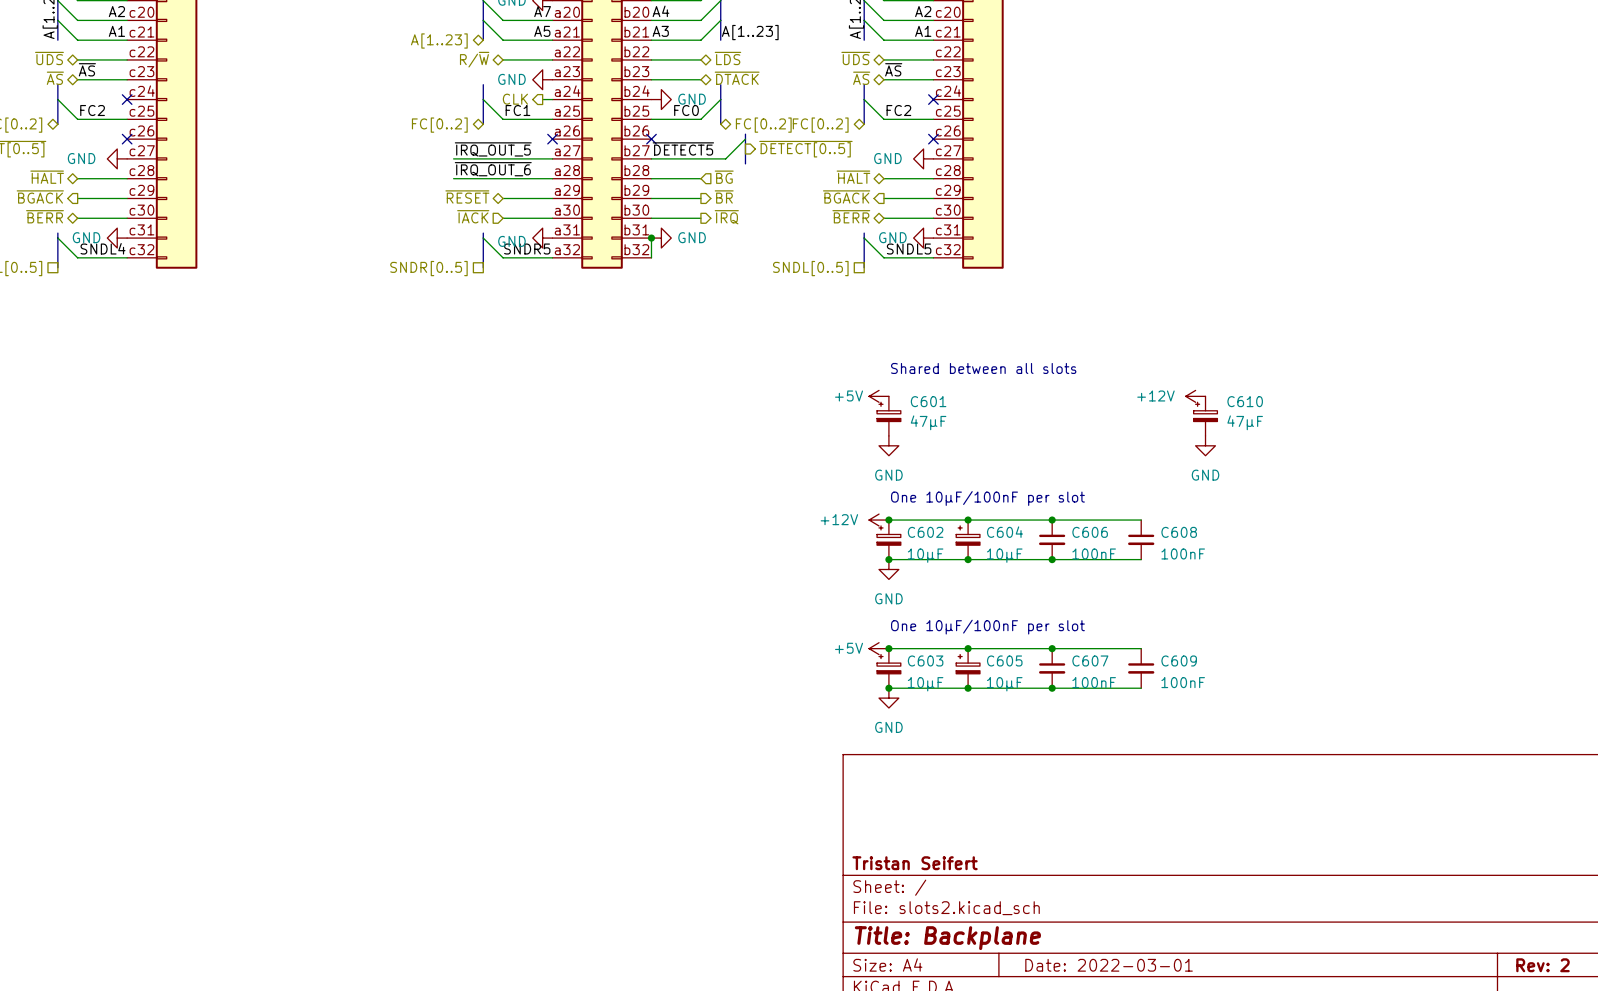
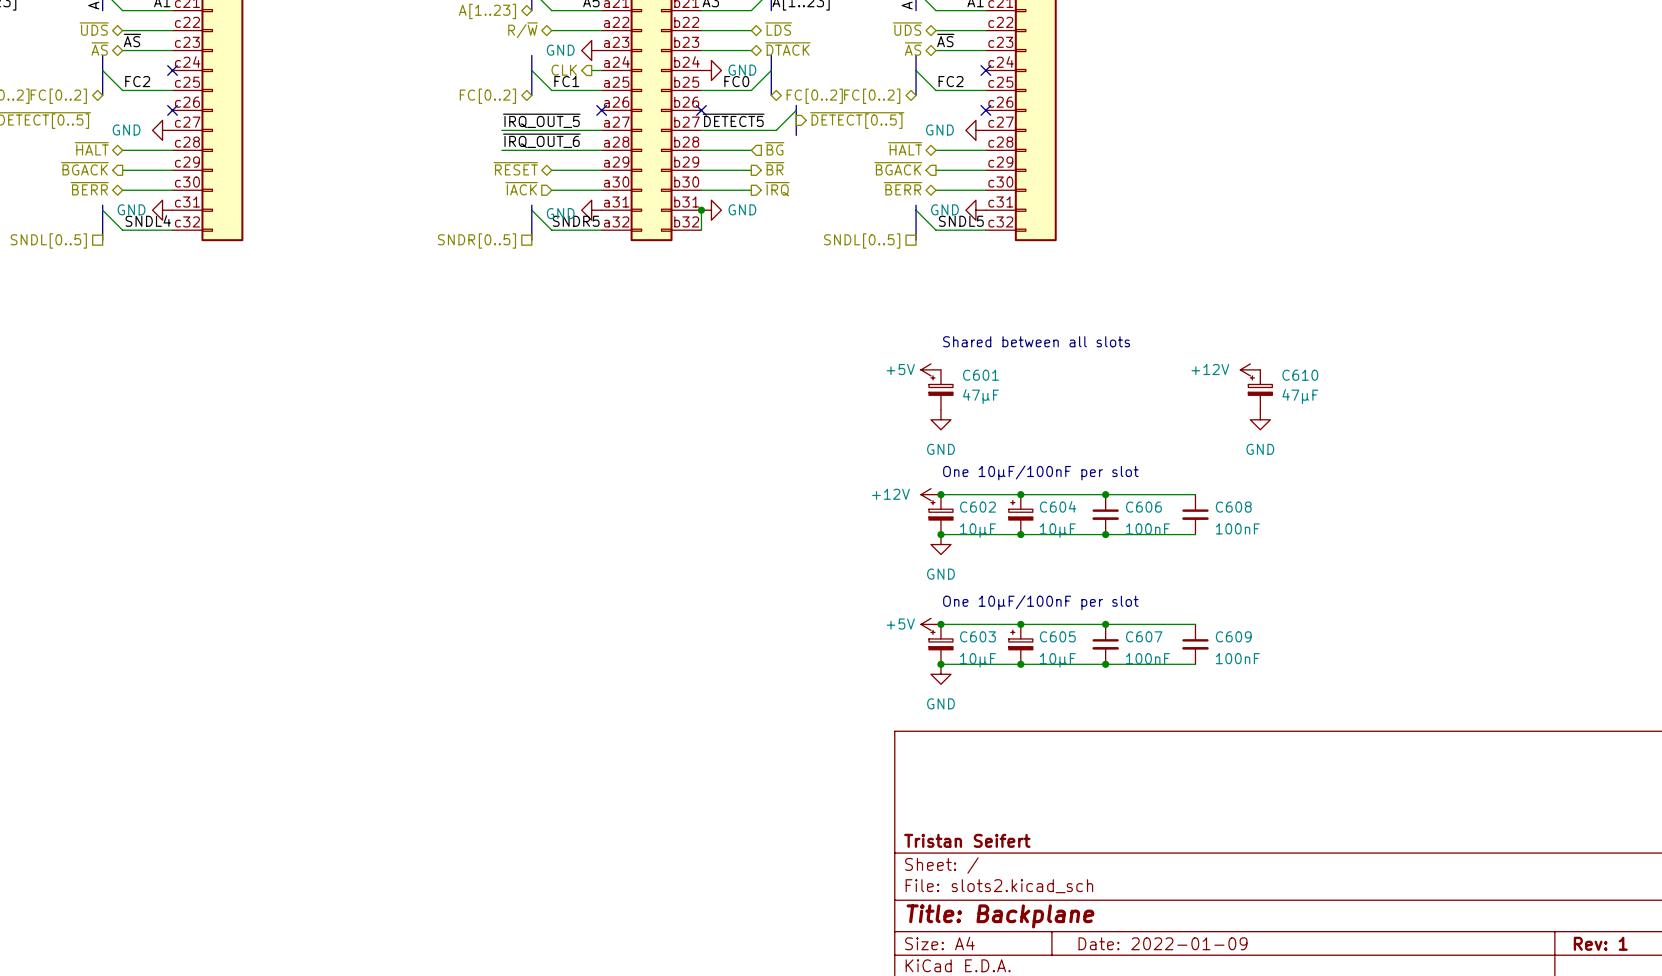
title block: Date: 2022-03-01 (1109, 965) -> Date: 2022-01-09 (1163, 943)
title block: Rev: 2 (1542, 965) -> Rev: 1 (1600, 943)

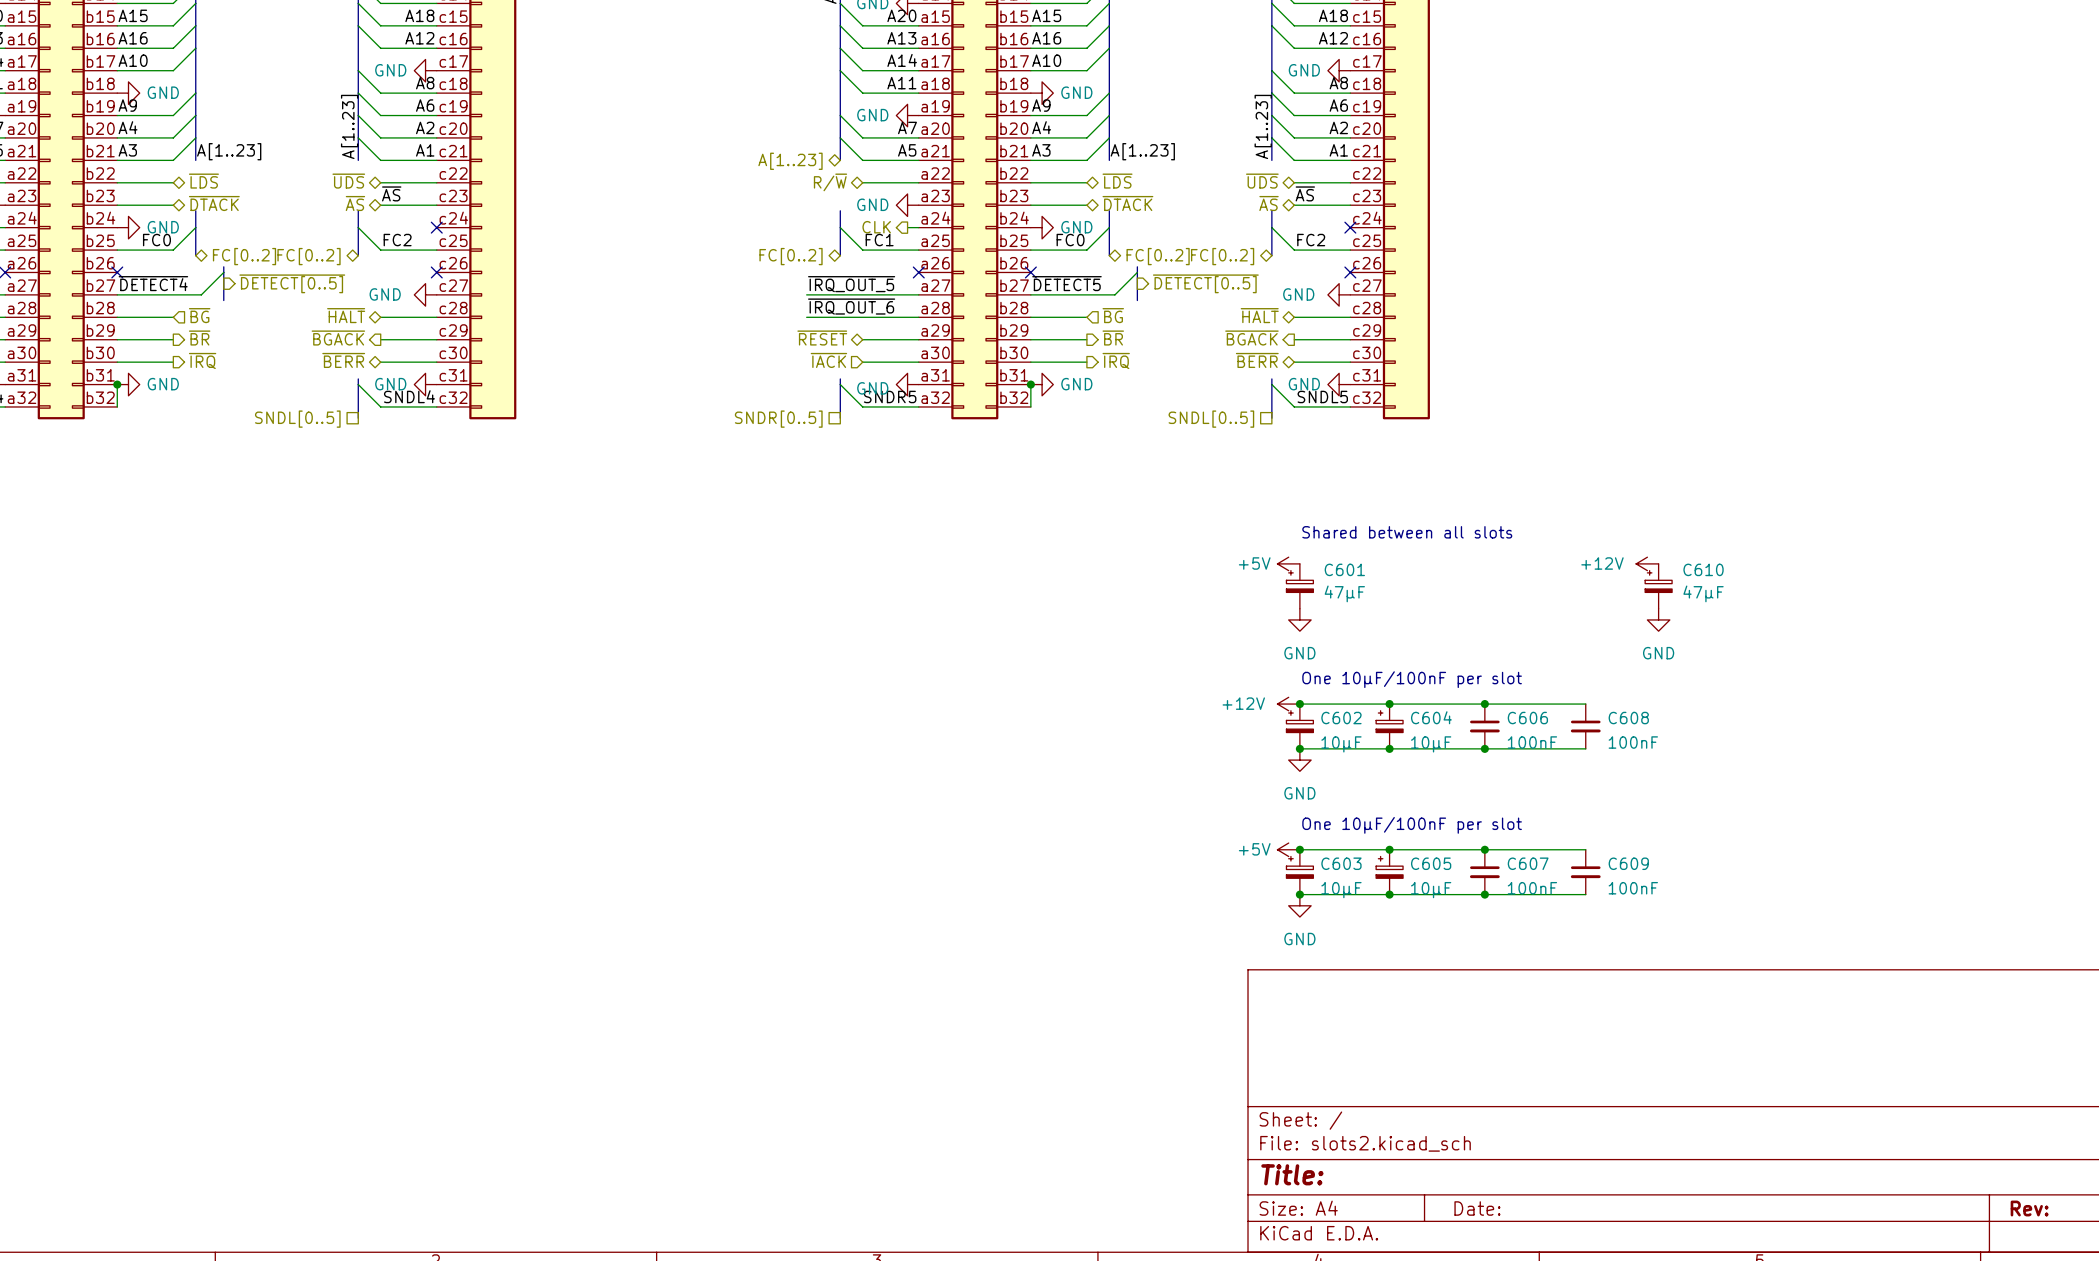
title block: Tristan Seifert (967, 840) -> none
title block: Title: Backplane (1000, 916) -> Title: (1292, 1174)
title block: Date: 2022-01-09 (1163, 943) -> Date: (1477, 1208)
title block: Rev: 1 (1600, 943) -> Rev: (2029, 1208)

